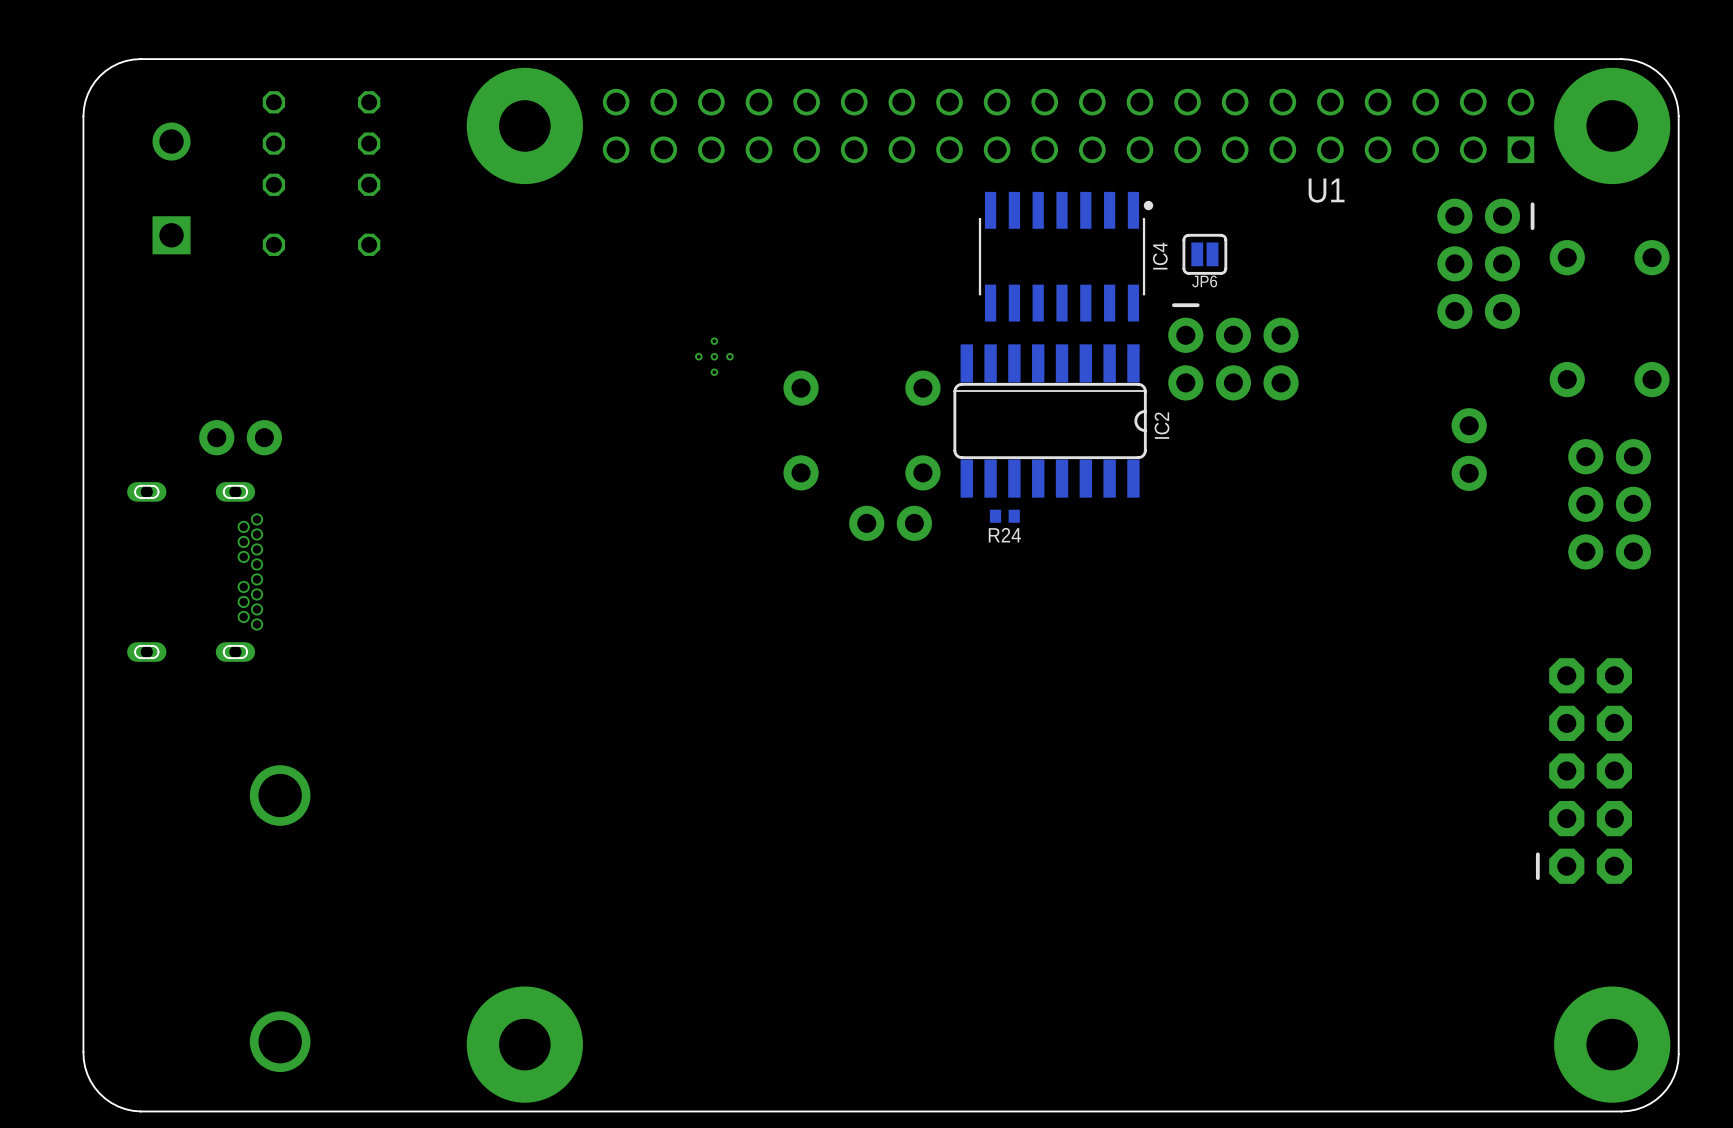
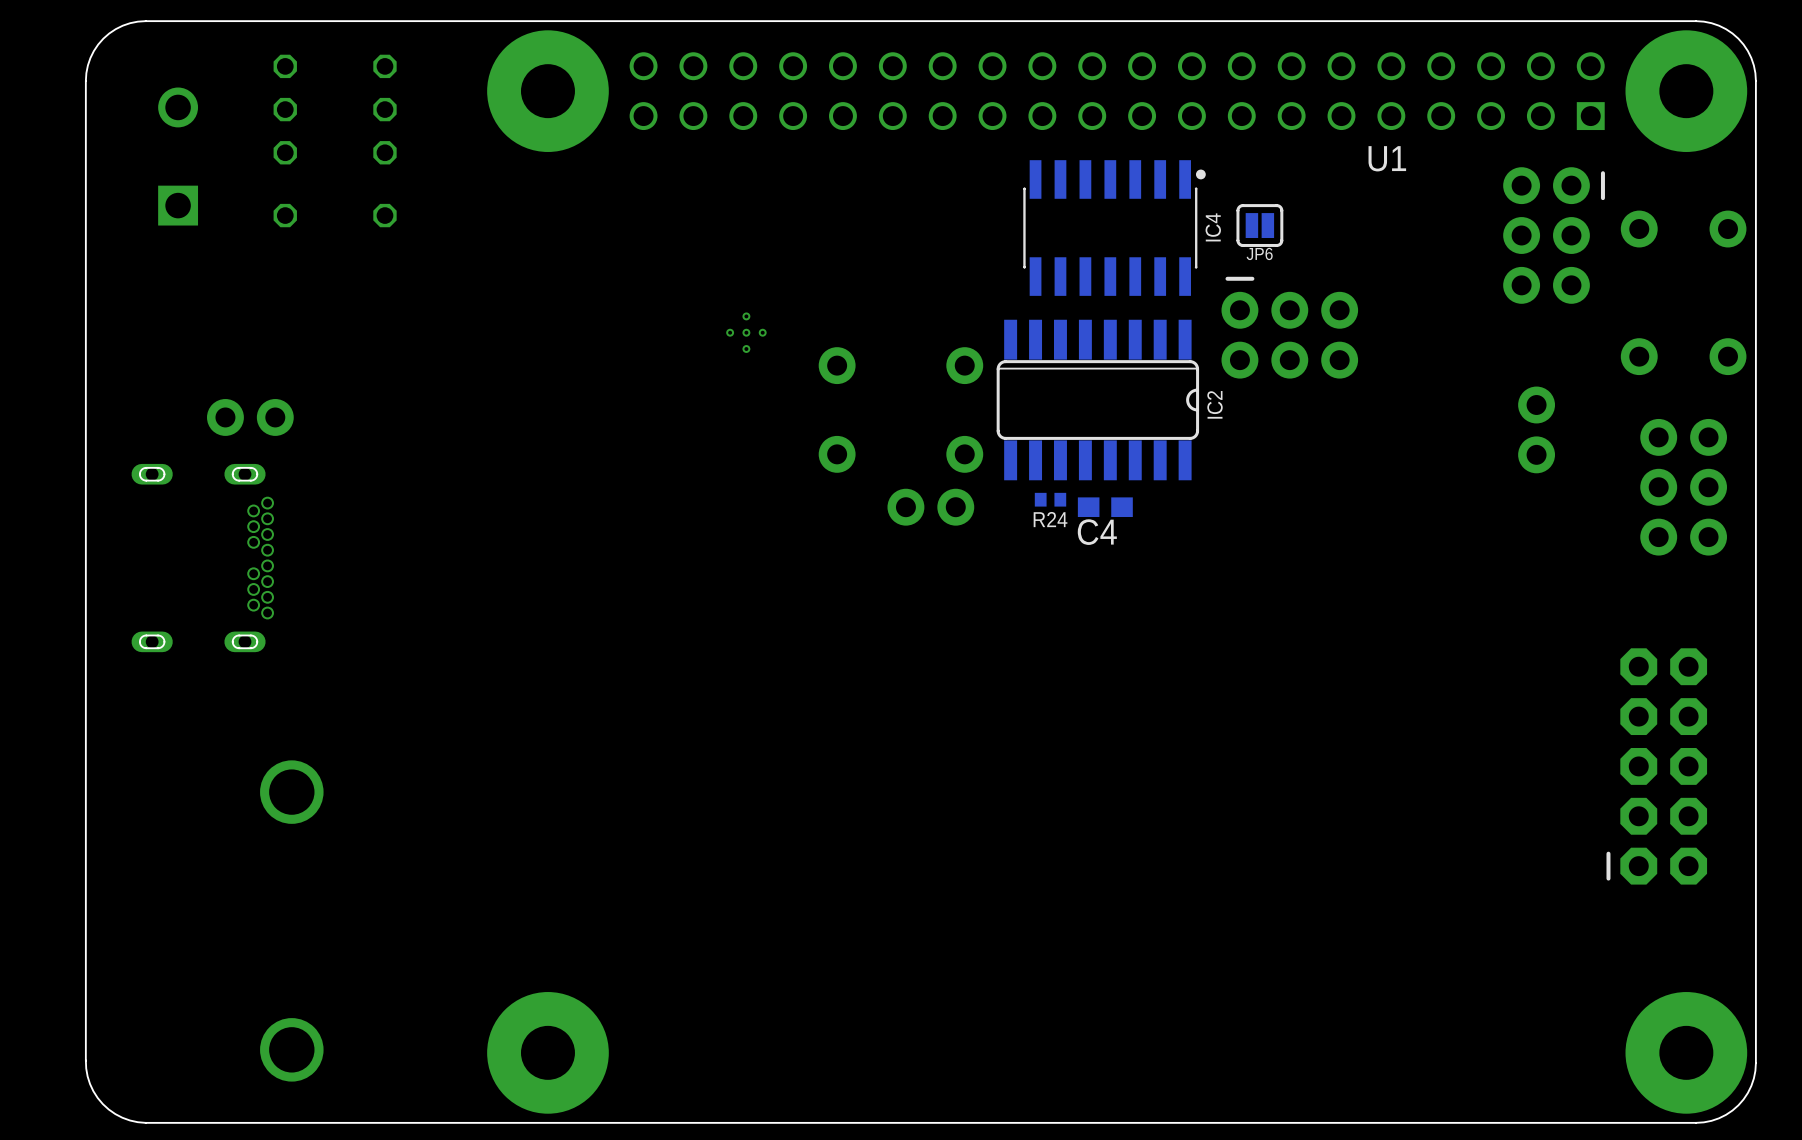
C4: none -> (1105, 507)

